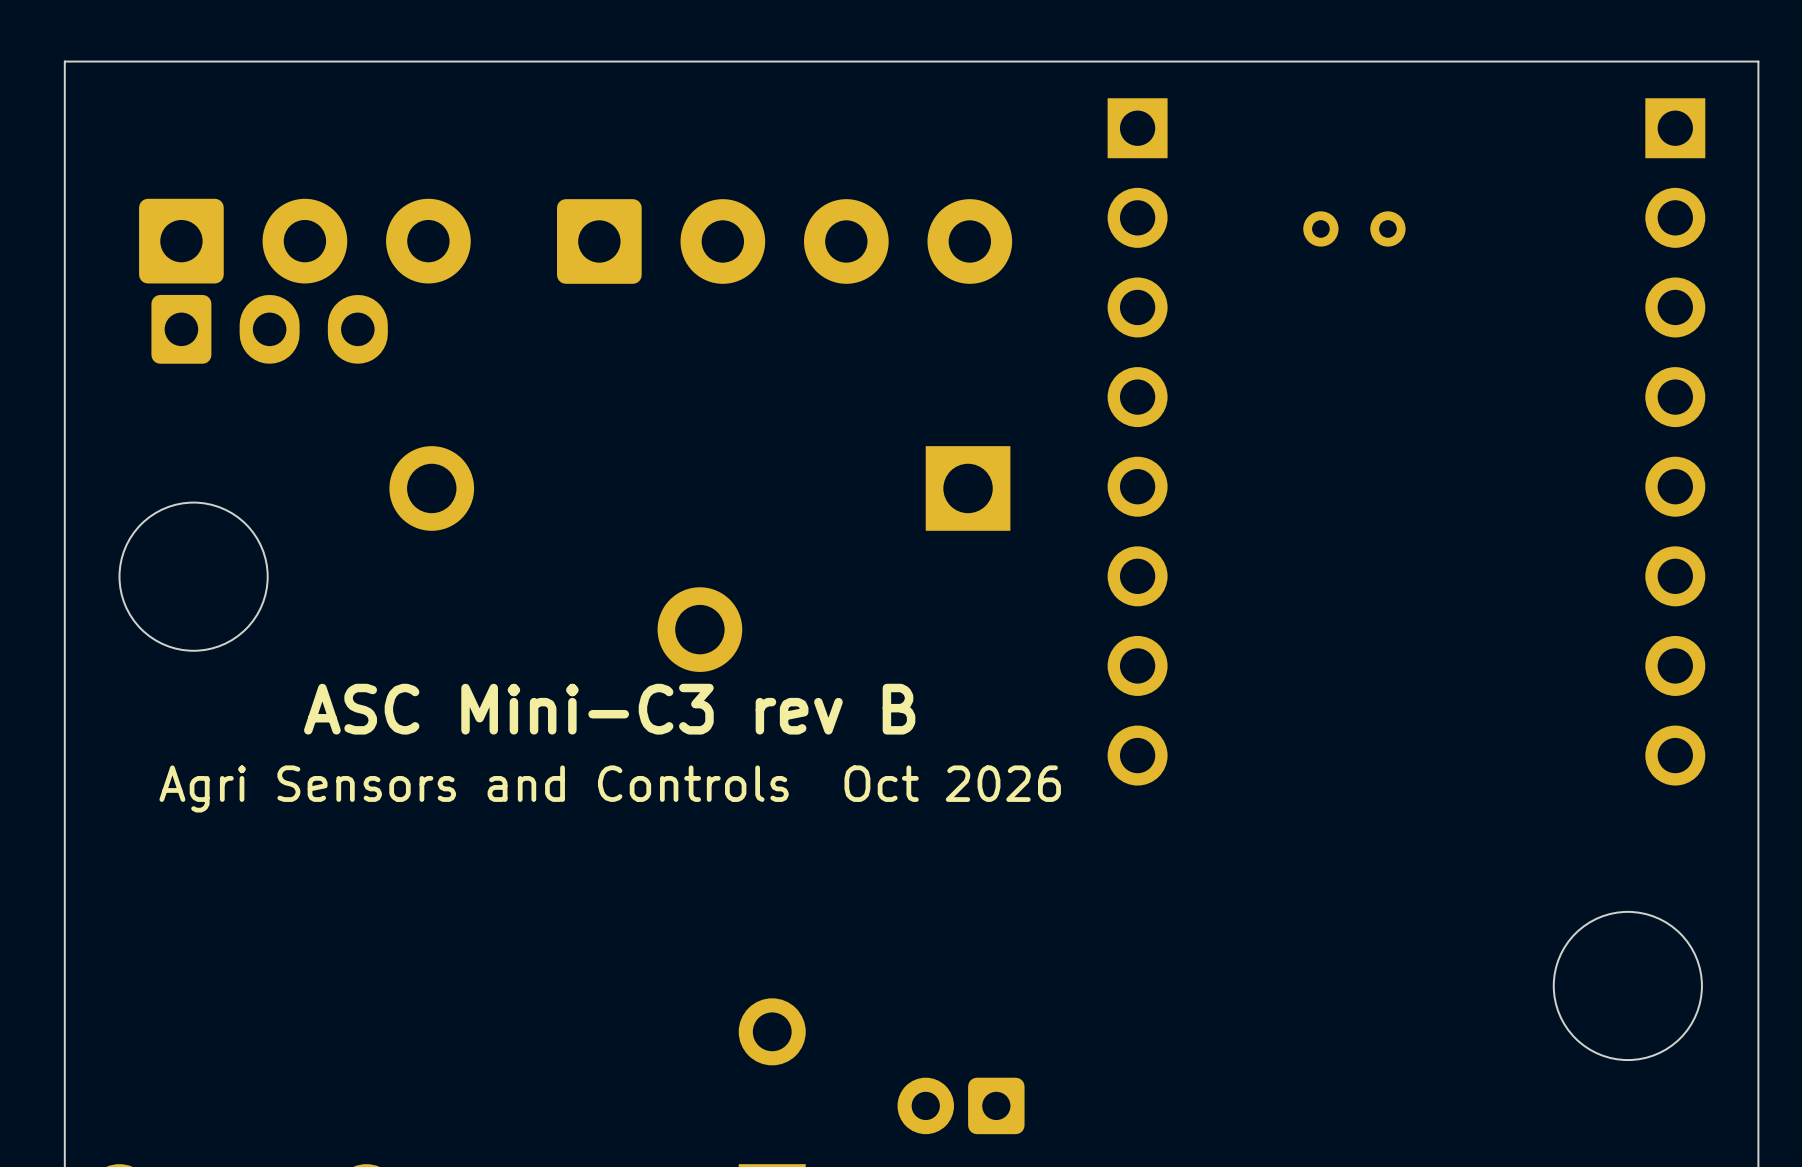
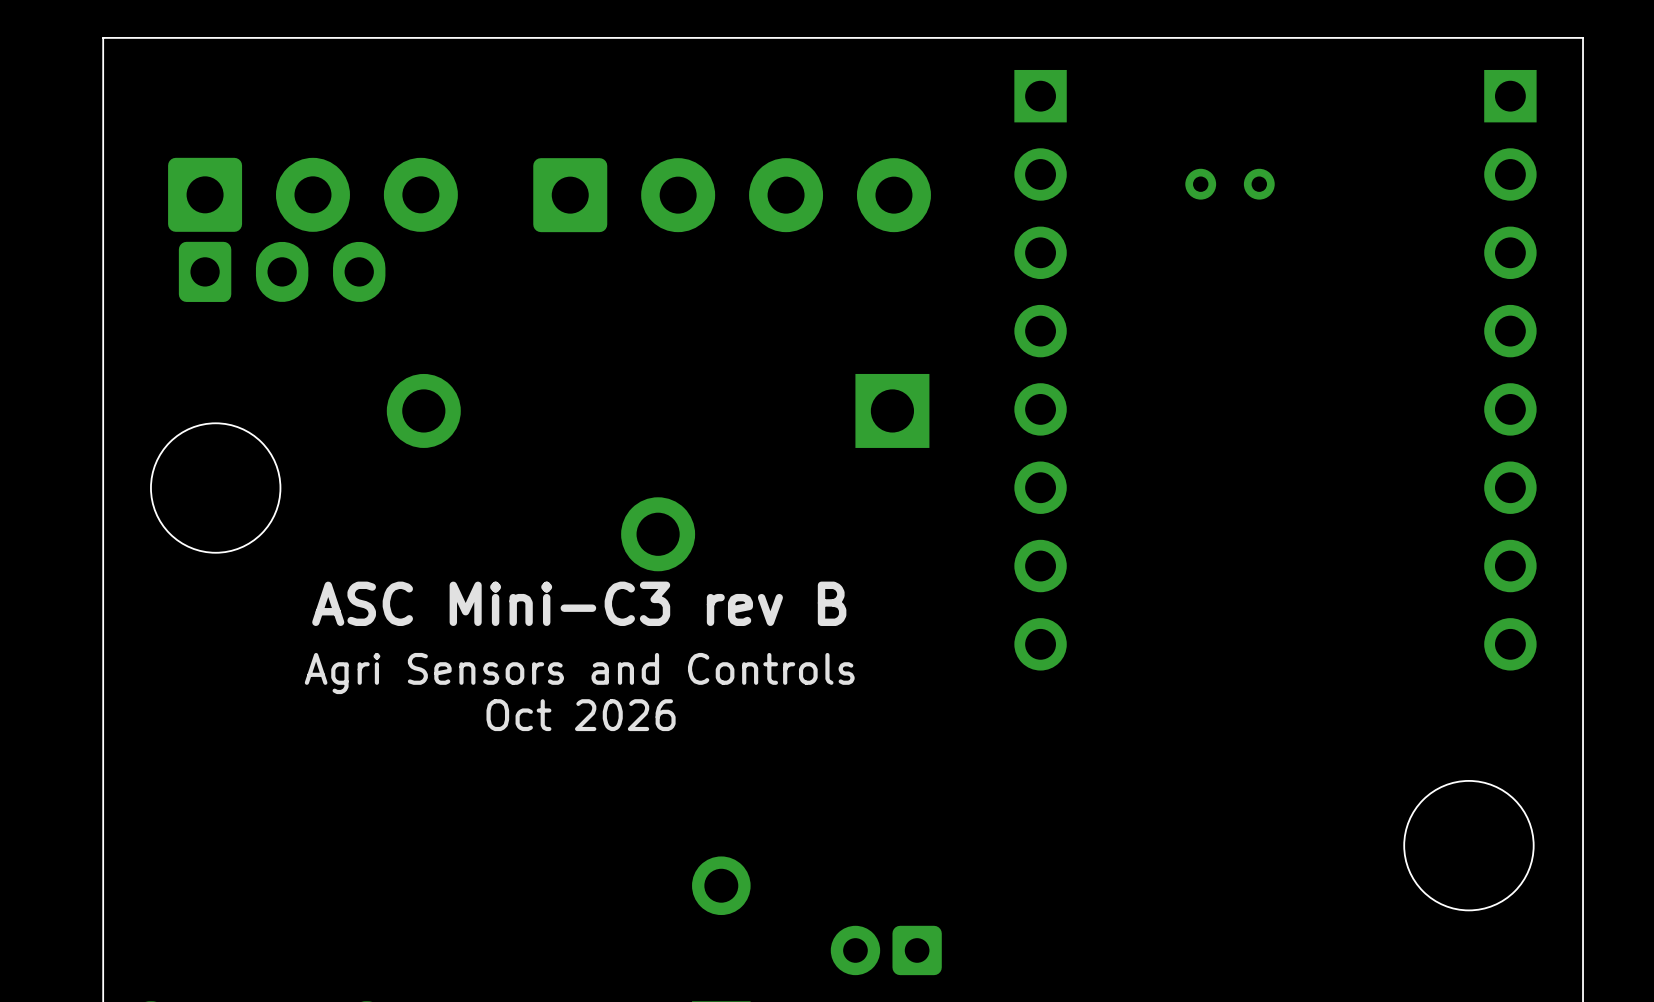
text: Agri Sensors and Controls Oct 2026 (610, 788) -> Agri Sensors and Controls (579, 673)
text: none -> Oct 2026 (581, 715)

